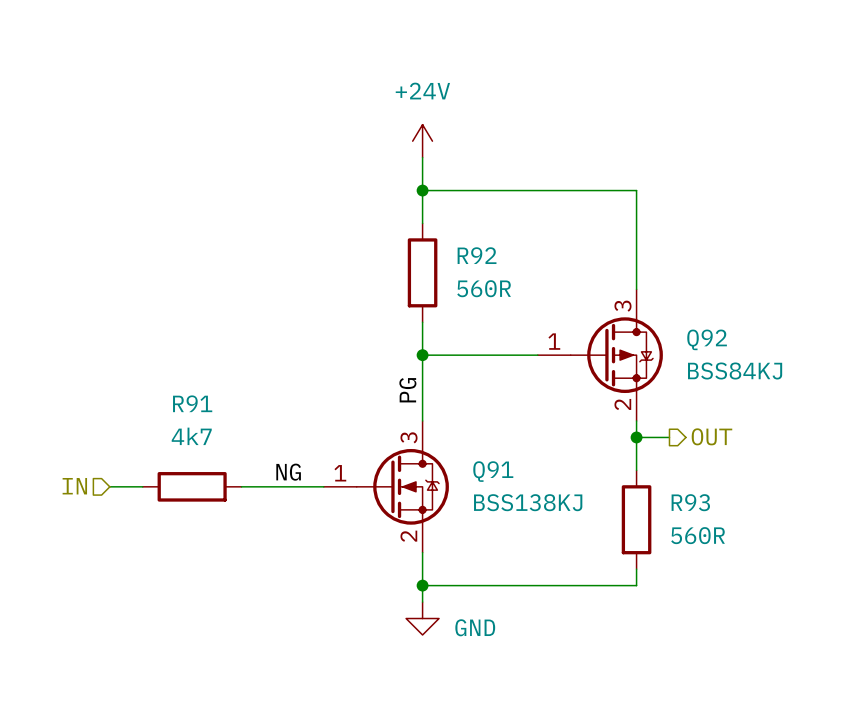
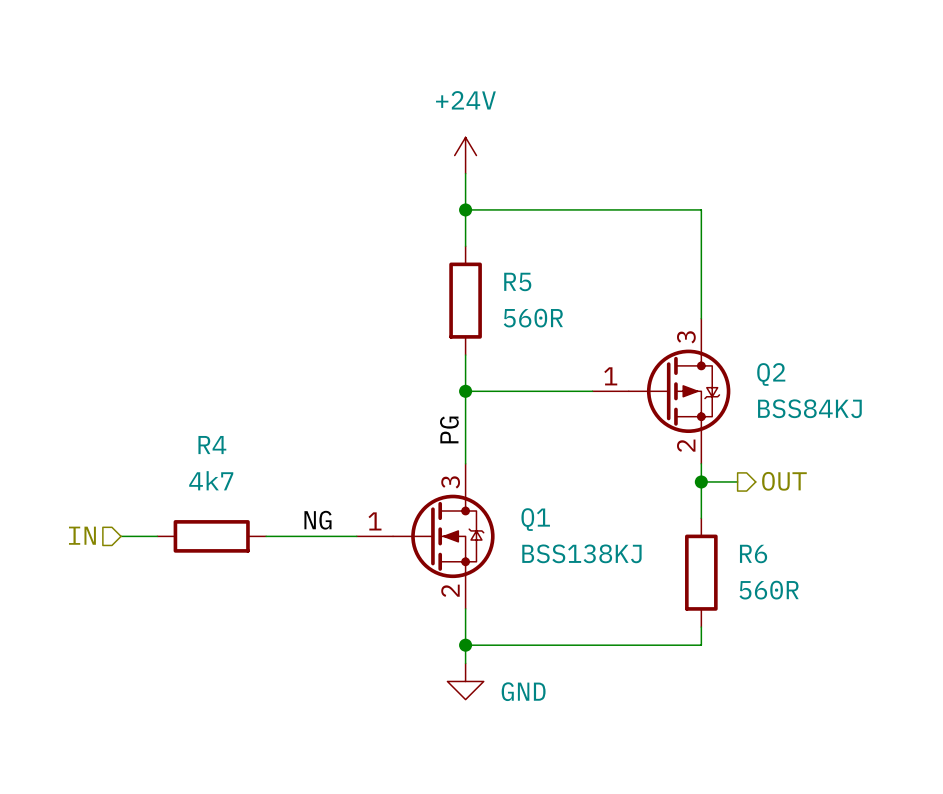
R92 name: R92 (477, 255) -> R5 (517, 281)
Q92 name: Q92 (707, 339) -> Q2 (771, 374)
R91 name: R91 (192, 403) -> R4 (212, 445)
Q91 name: Q91 (493, 471) -> Q1 (535, 519)
R93 name: R93 (690, 502) -> R6 (753, 554)

